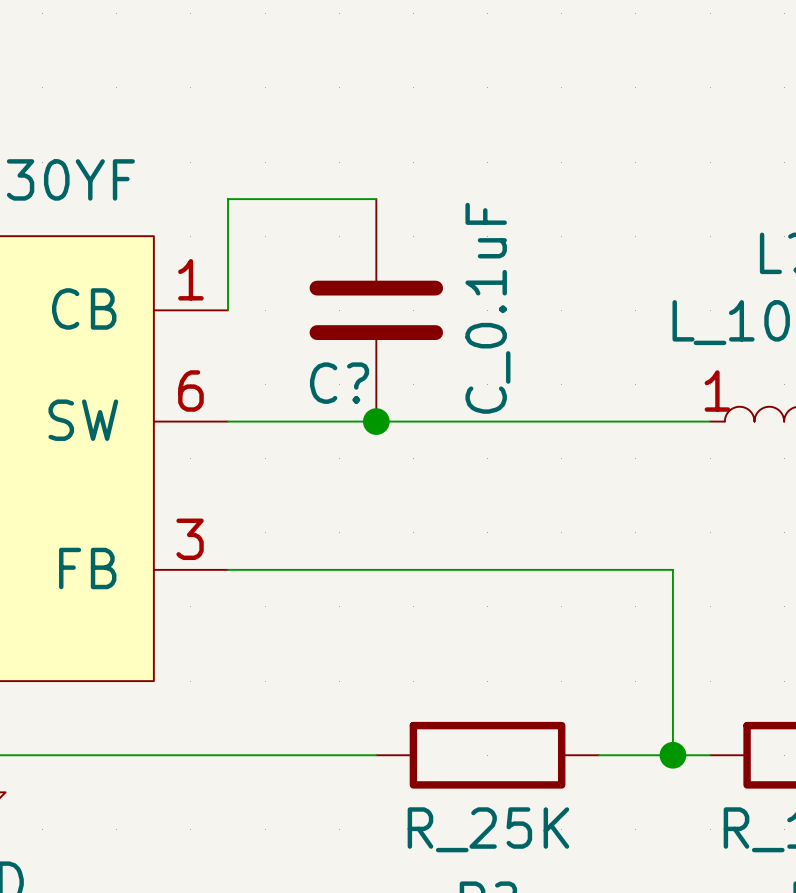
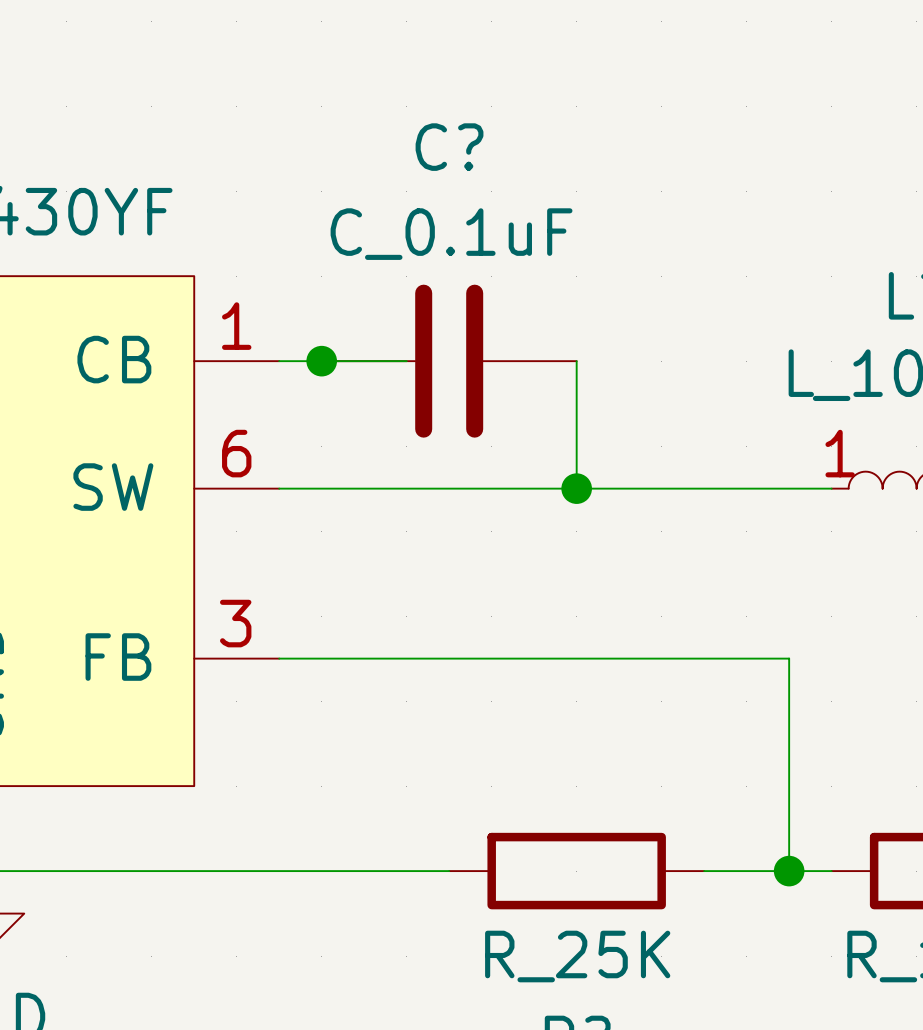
wire: (376, 199) (228, 199) (228, 310) -> (406, 361) (279, 361)
C? value position: C_0.1uF (487, 308) -> C_0.1uF (451, 234)
junction: none -> (321, 361)
C? rotation: 0° (376, 310) -> 90° clockwise (449, 361)
wire: none -> (576, 361) (576, 488)
C? name position: C? (339, 383) -> C? (449, 147)
junction: (376, 421) -> none
junction: none -> (576, 488)

